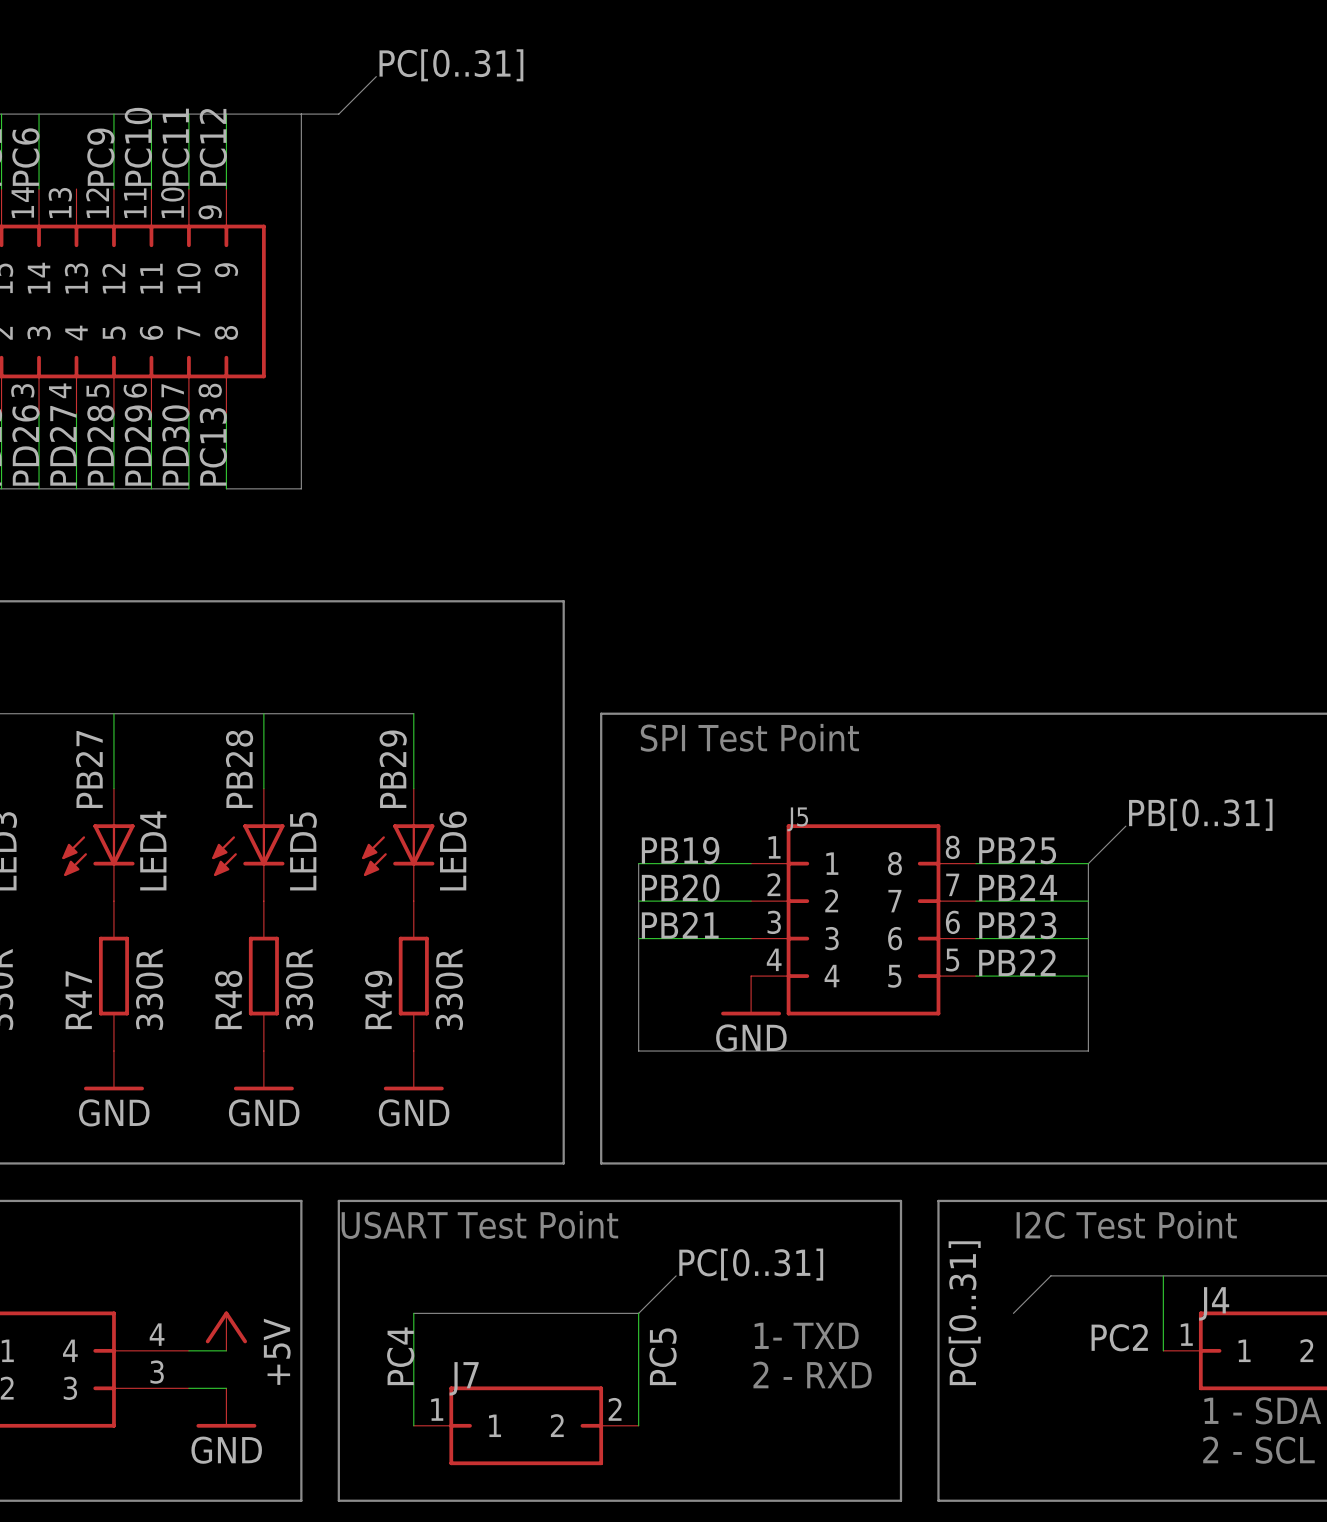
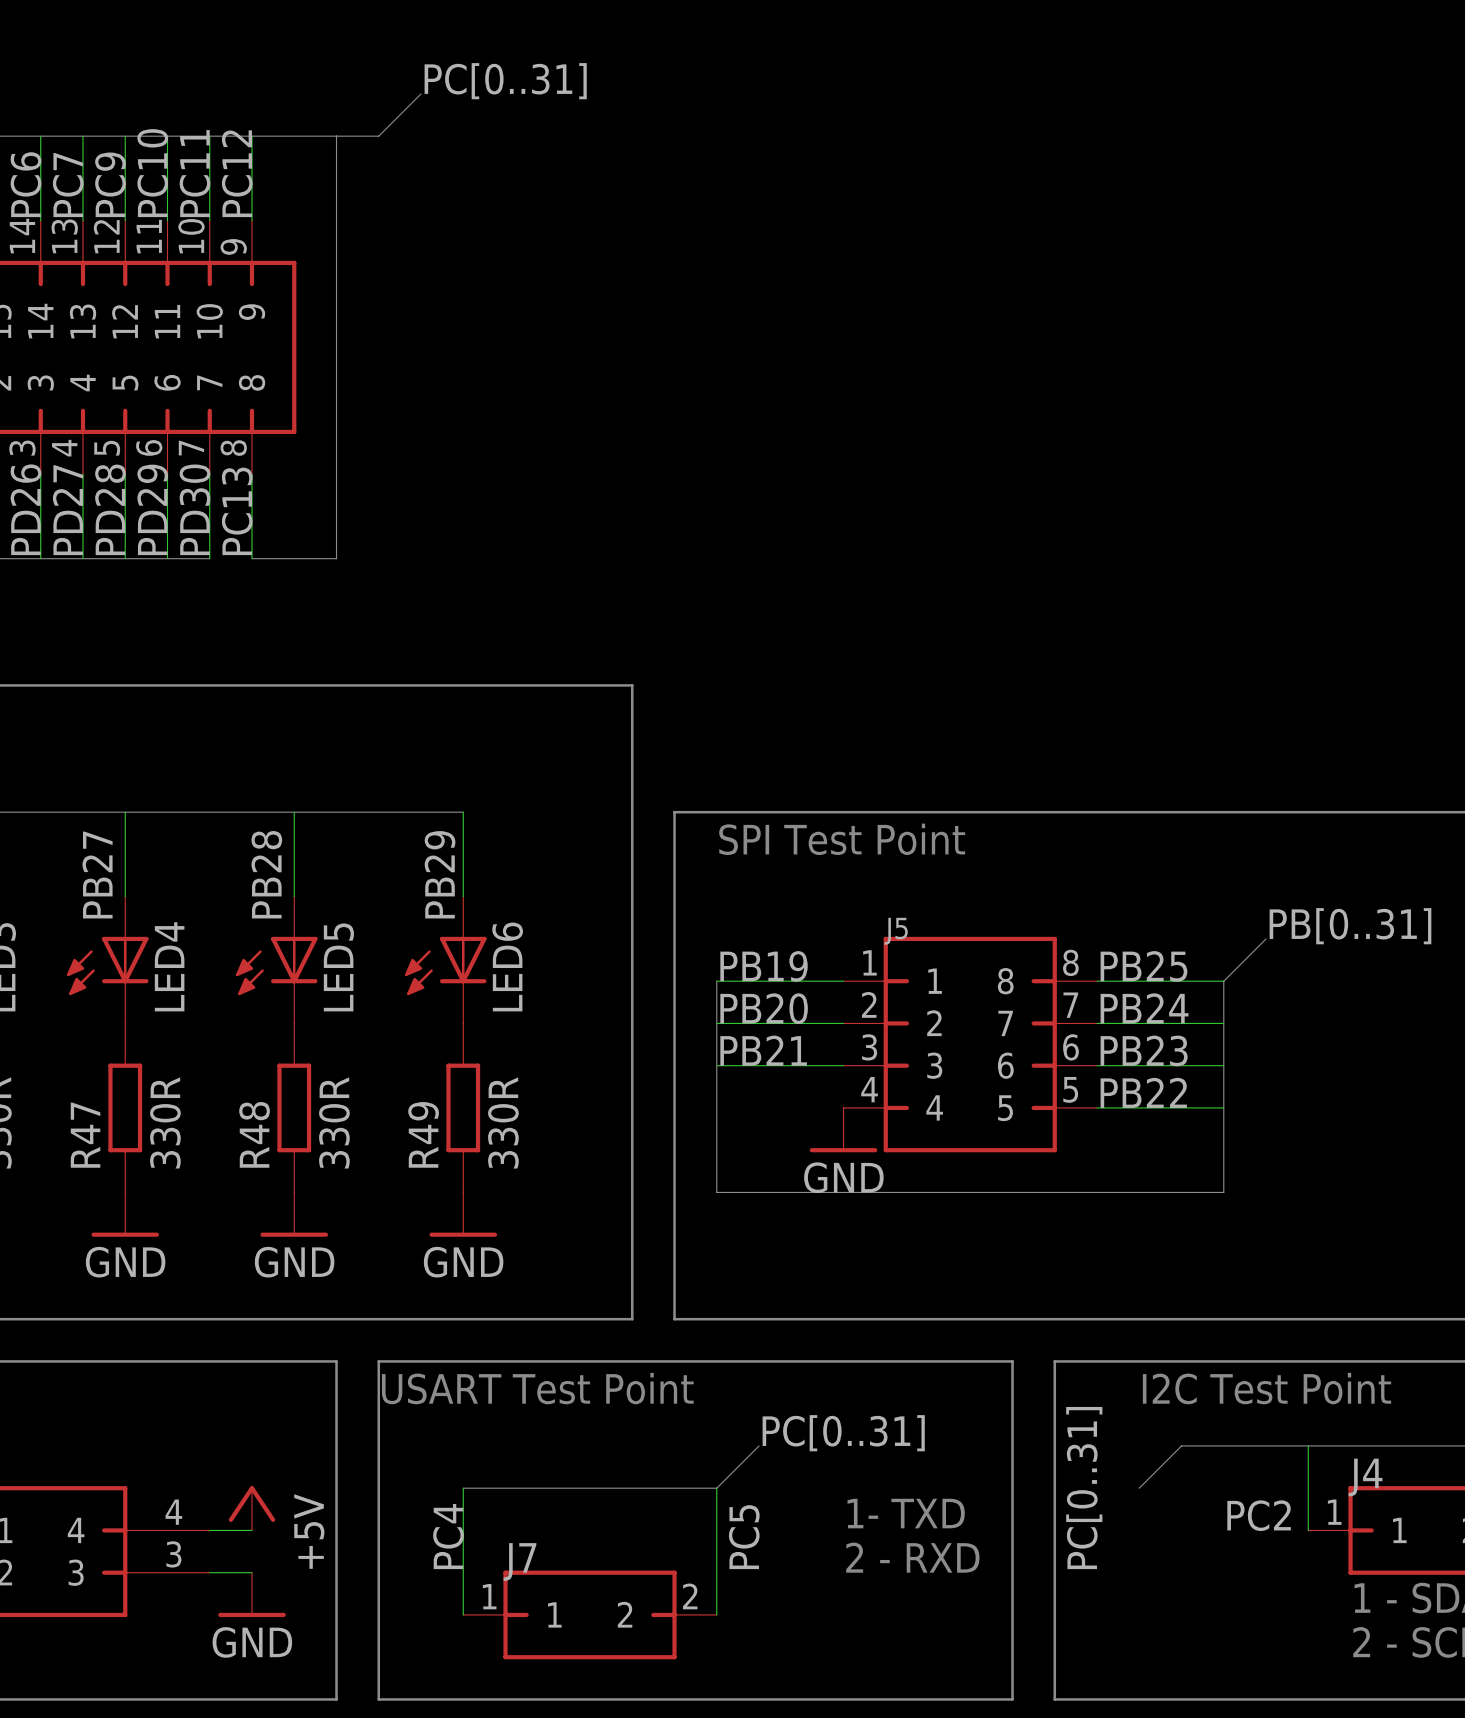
wire: none -> (83, 136) (83, 220)
label: none -> PC7 (68, 185)

